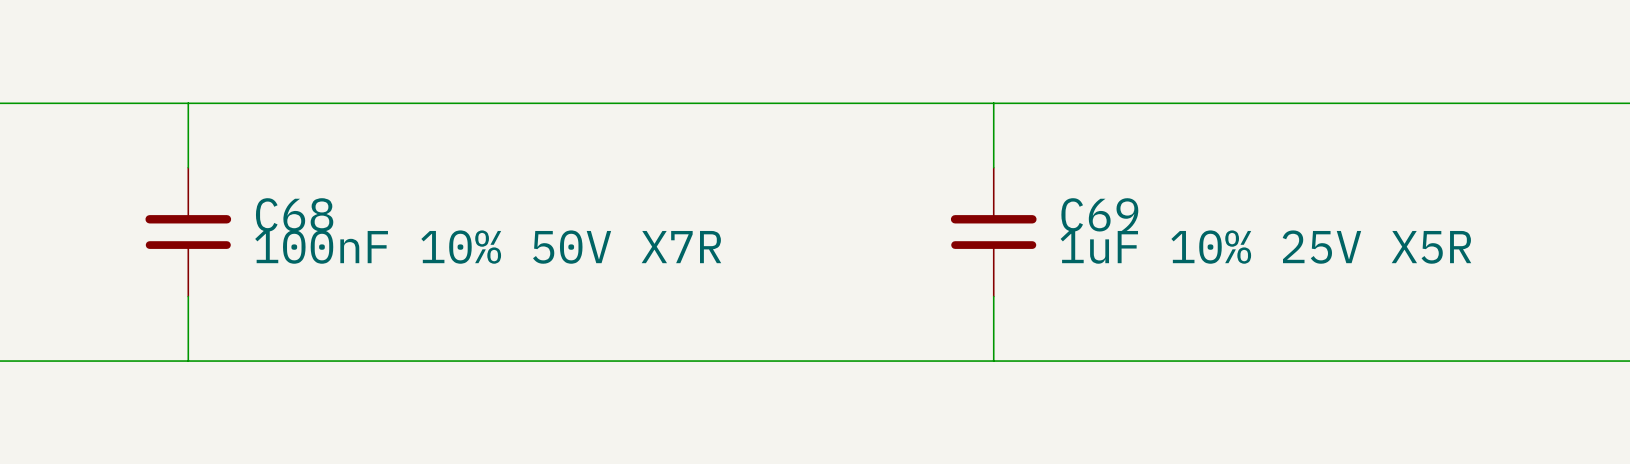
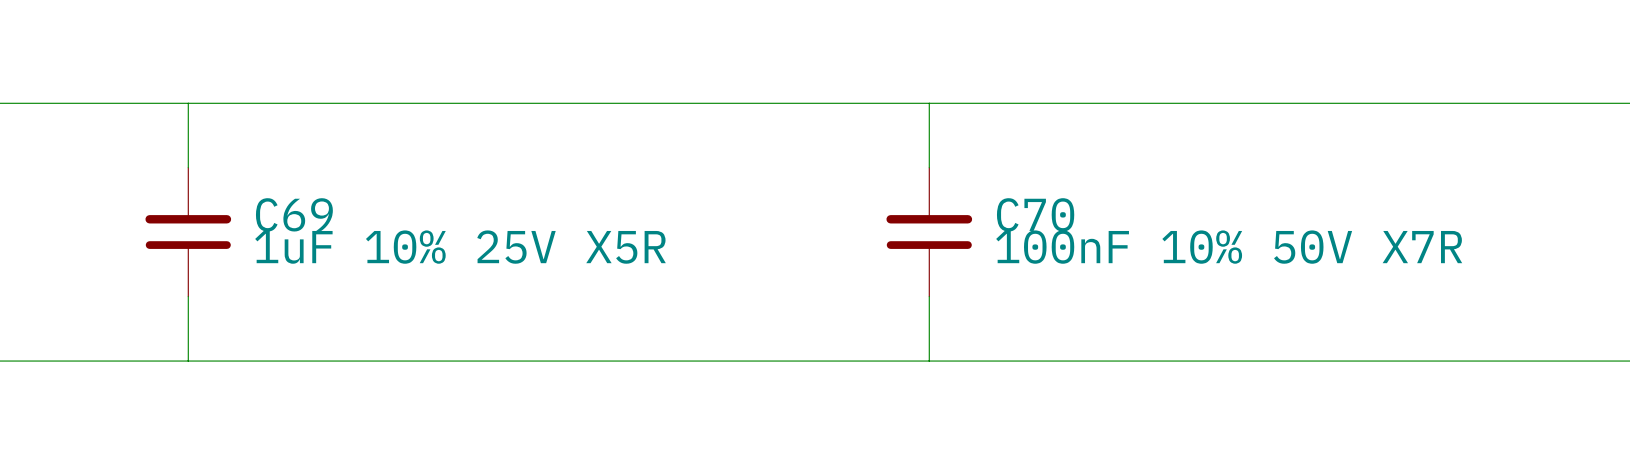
wire: (993, 103) (993, 167) -> (929, 103) (929, 167)
C68 name: C68 (294, 214) -> C69 (294, 214)
C70: none -> 100nF 10% 50V X7R (929, 232)
C69: 1uF 10% 25V X5R (993, 232) -> none
C68 value: 100nF 10% 50V X7R (488, 247) -> 1uF 10% 25V X5R (460, 247)
wire: (993, 296) (993, 361) -> (929, 296) (929, 361)

